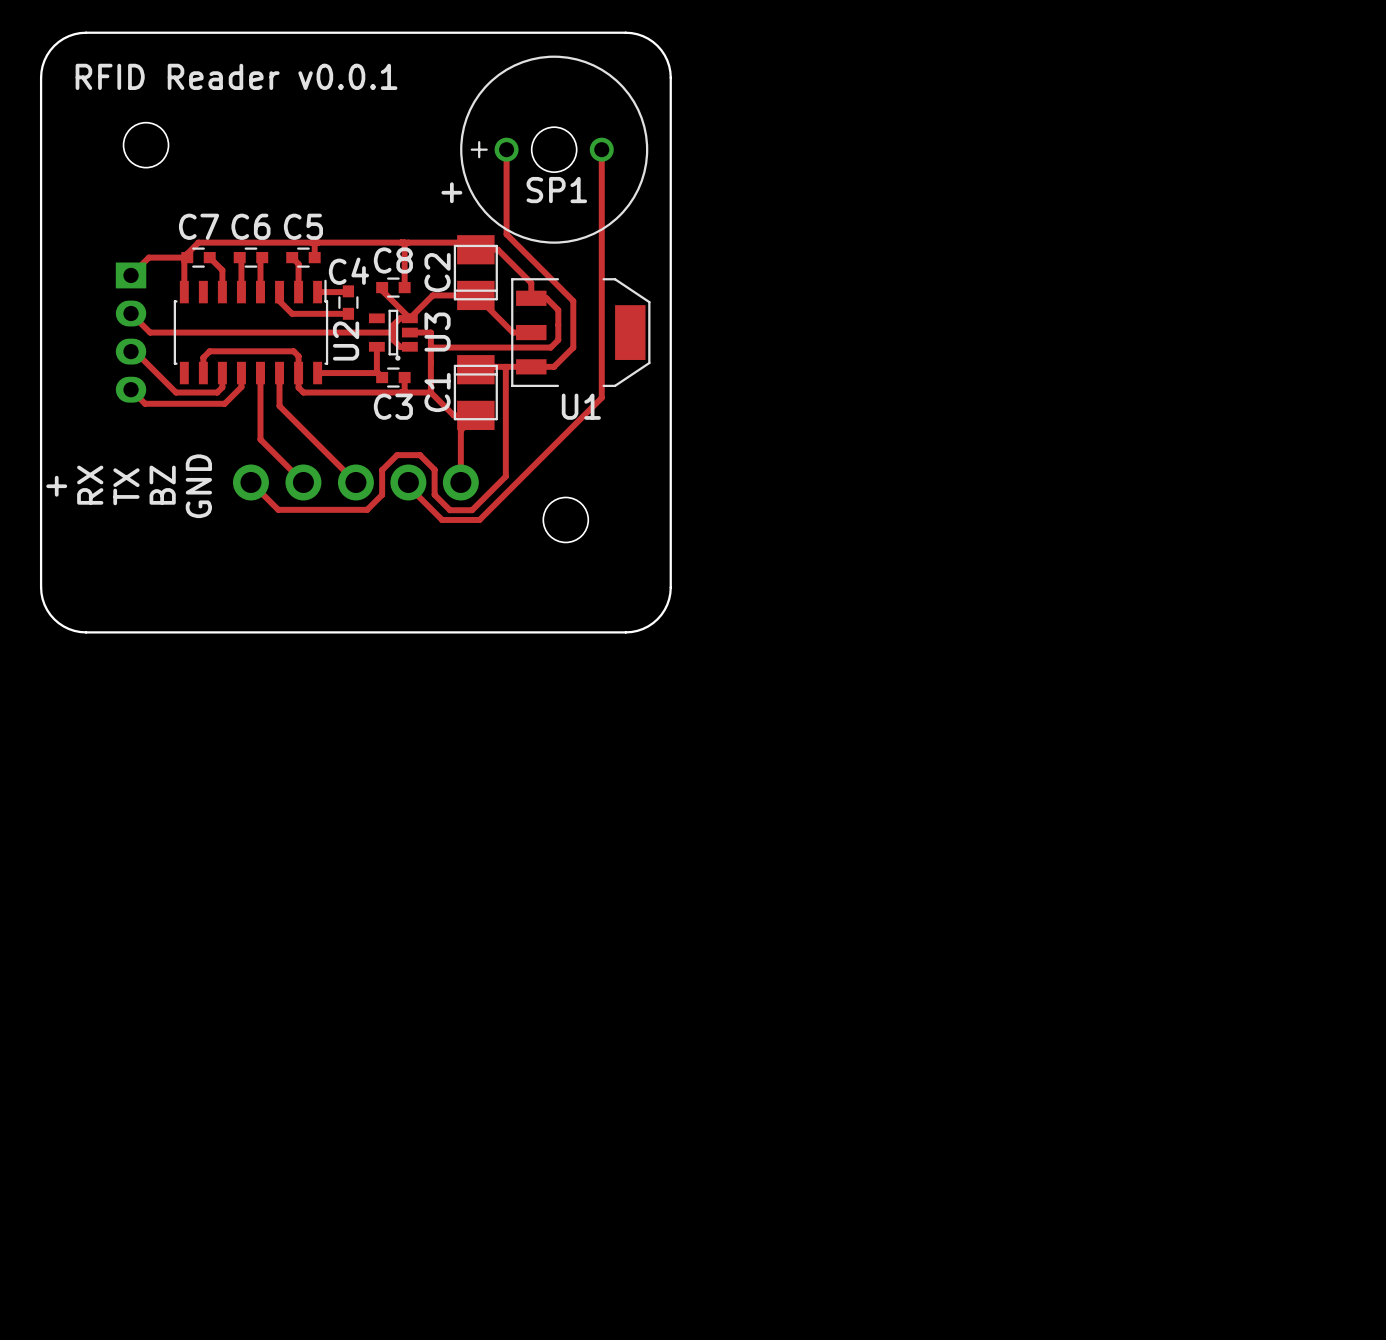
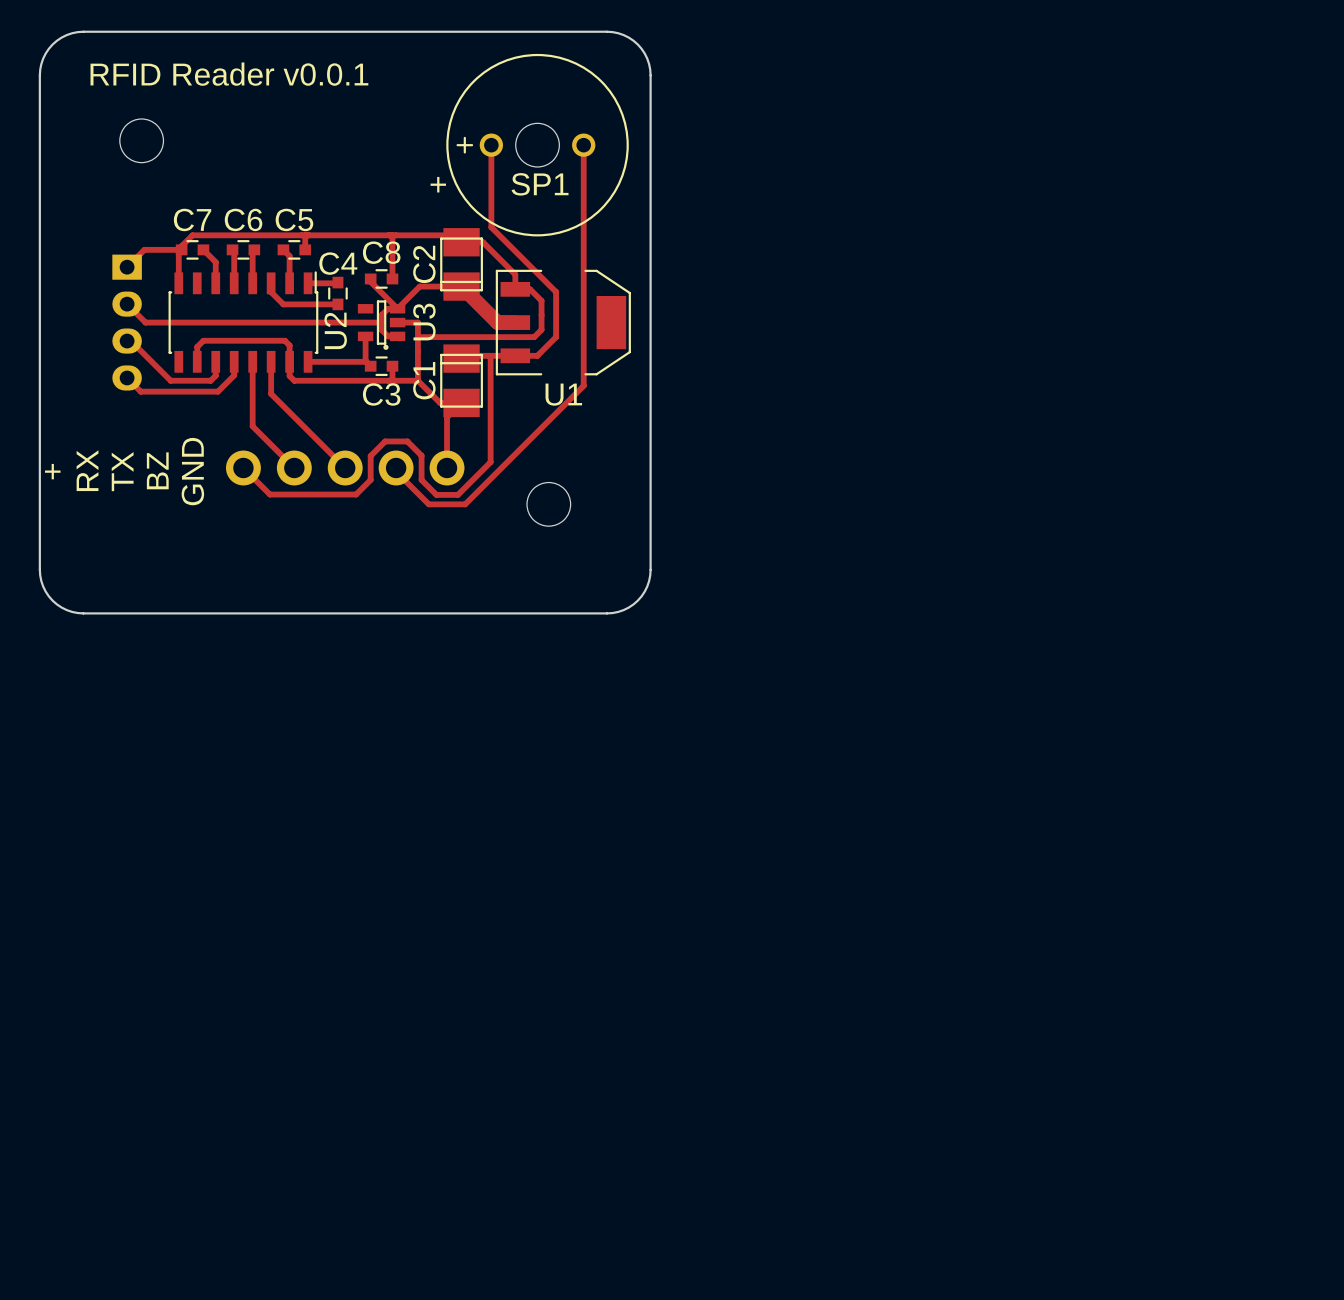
top track width: thin (475, 295) (512, 332) (531, 332) -> thick (461, 286) (497, 322) (515, 322)

